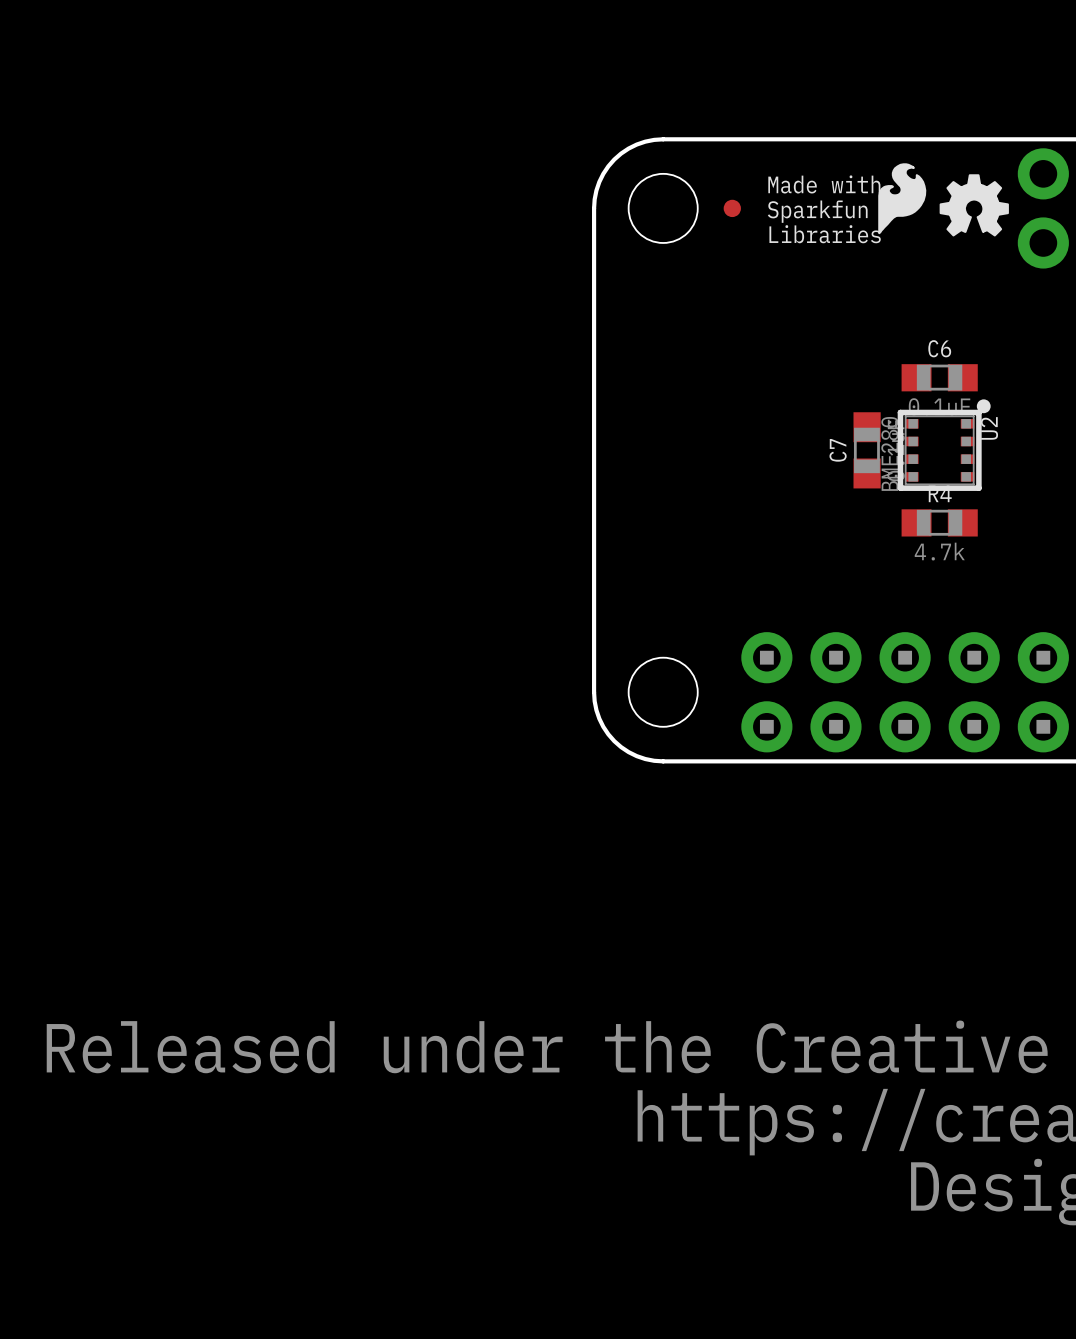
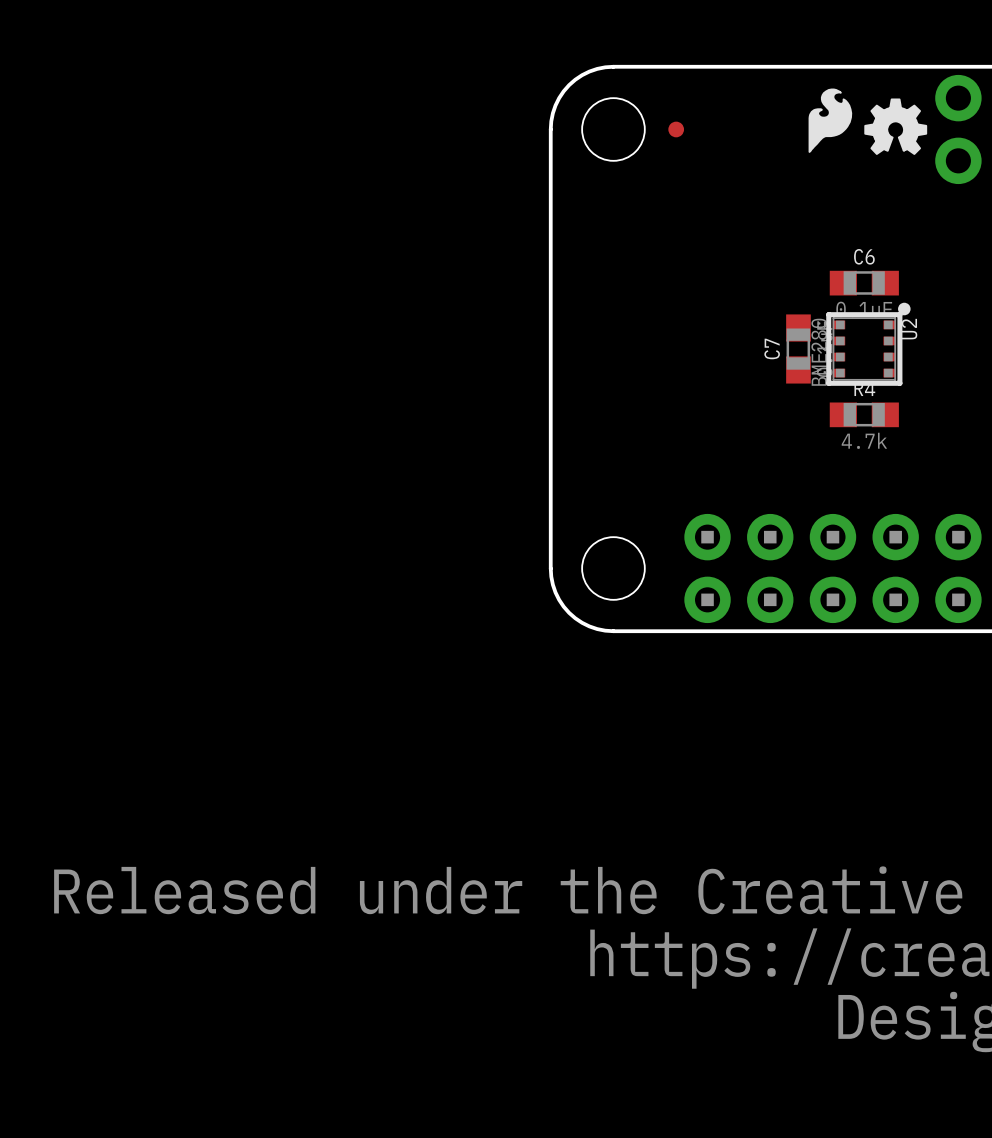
text: Made with (824, 184) -> none
text: Sparkfun (817, 211) -> none
text: Libraries (825, 234) -> none

